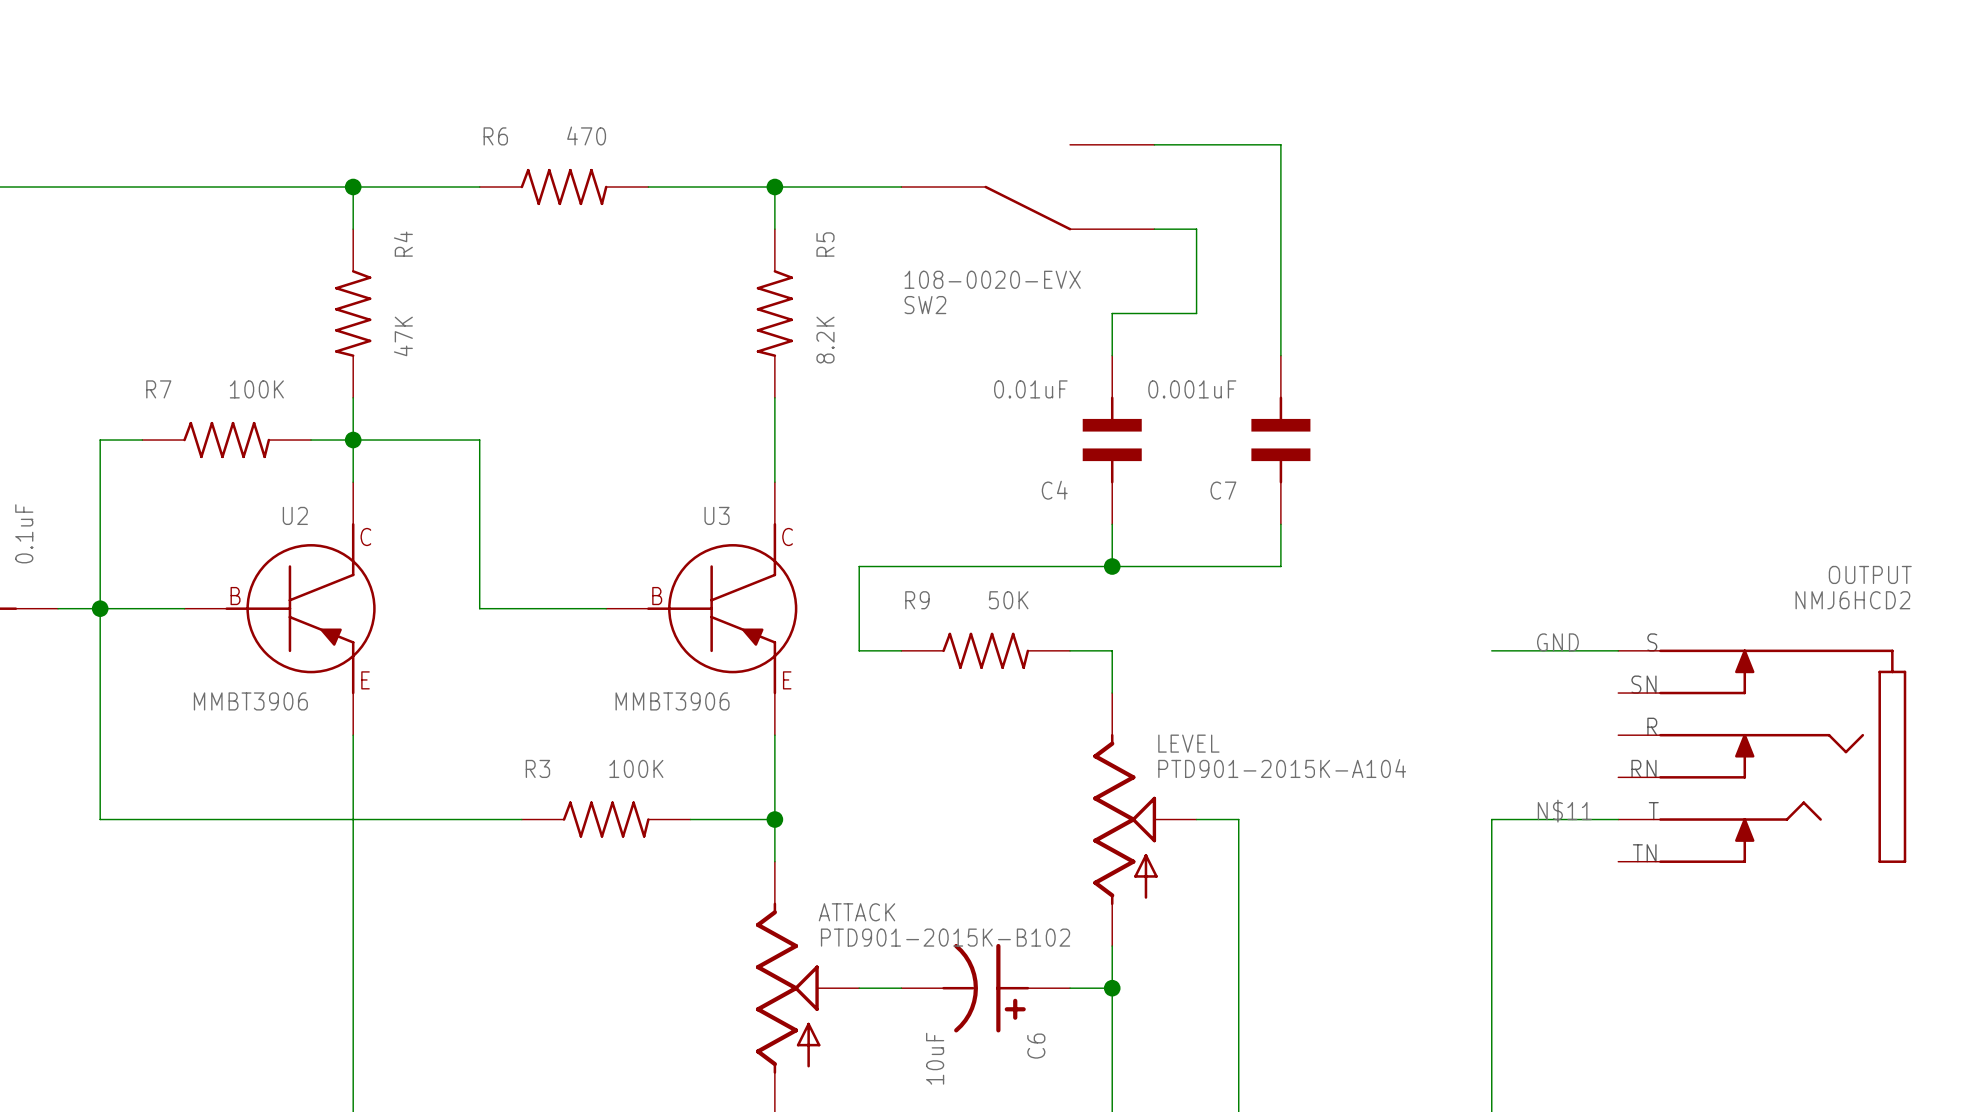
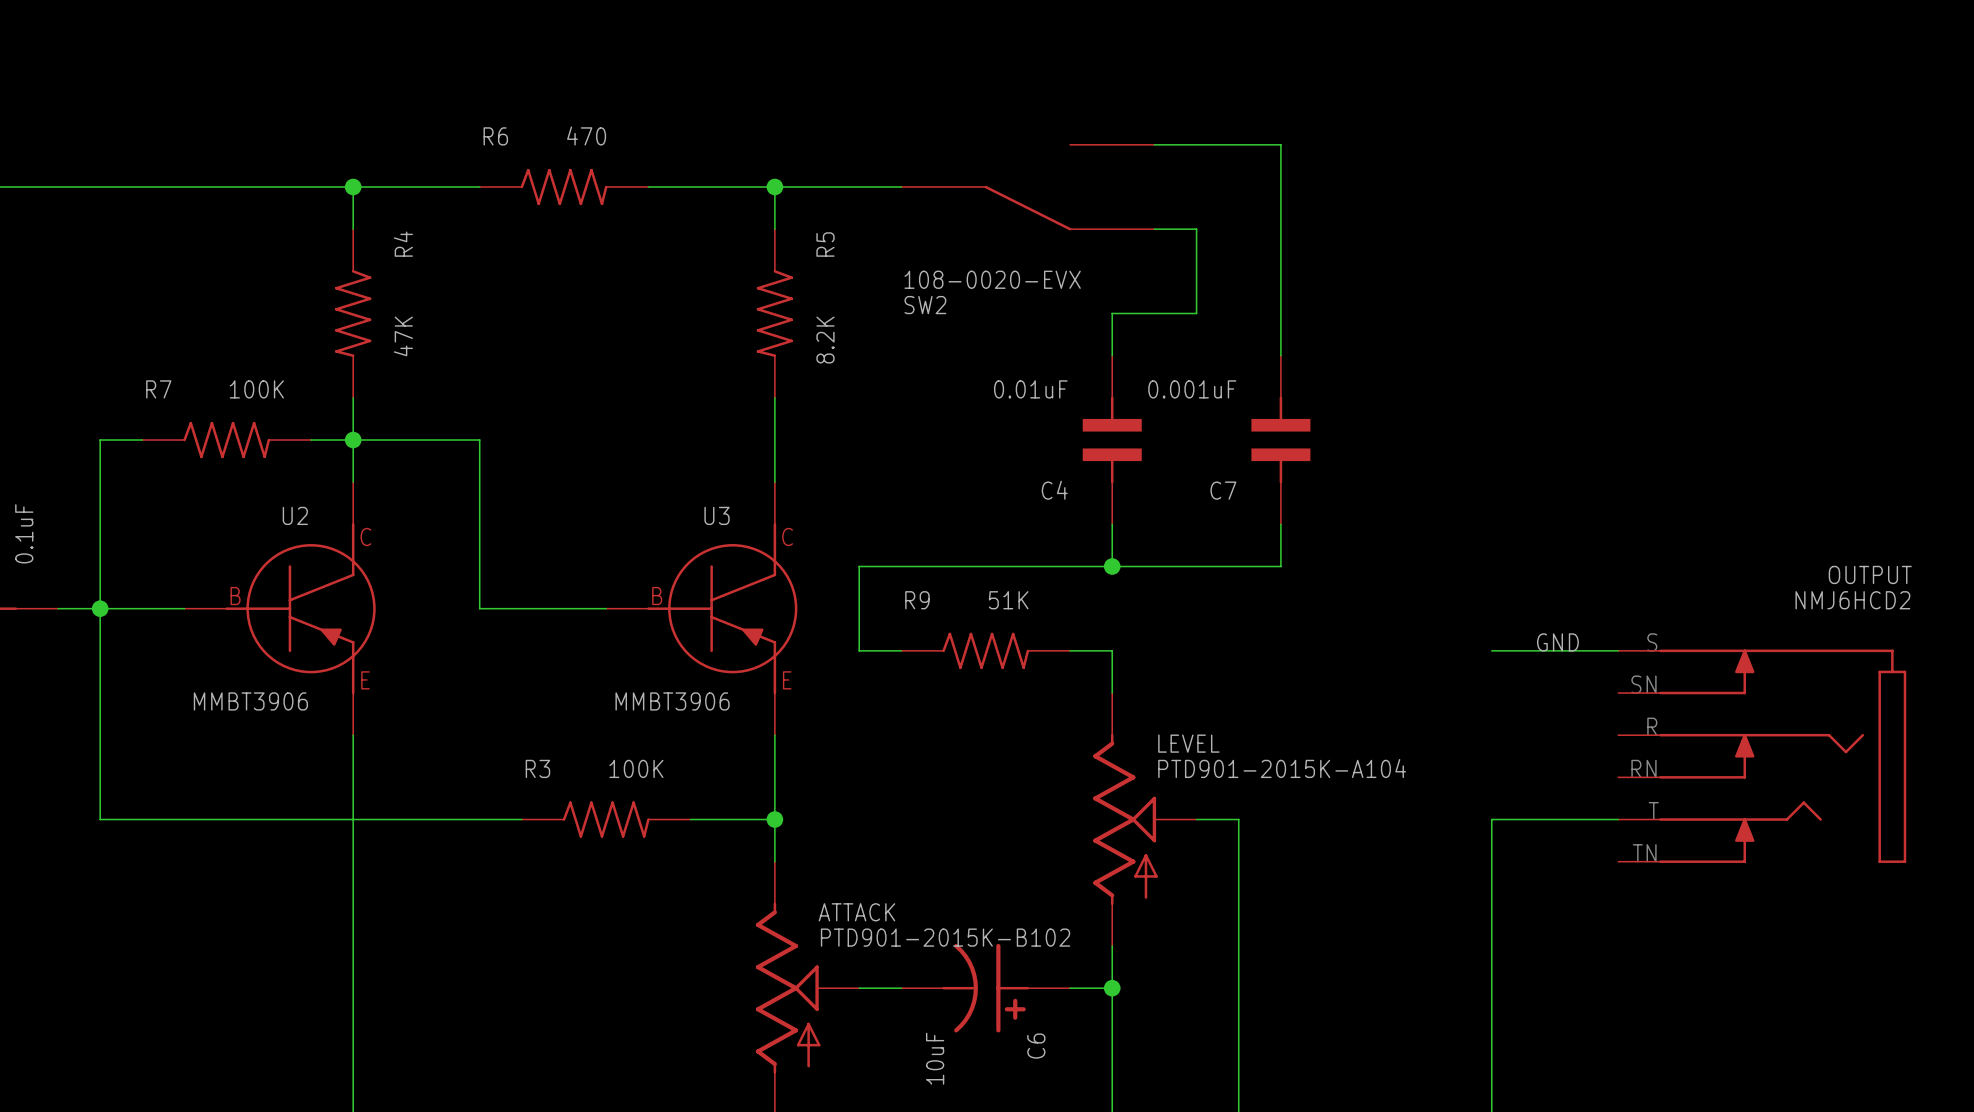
R9 value: 50K (1008, 600) -> 51K (1008, 600)
label: N$11 (1564, 811) -> none

